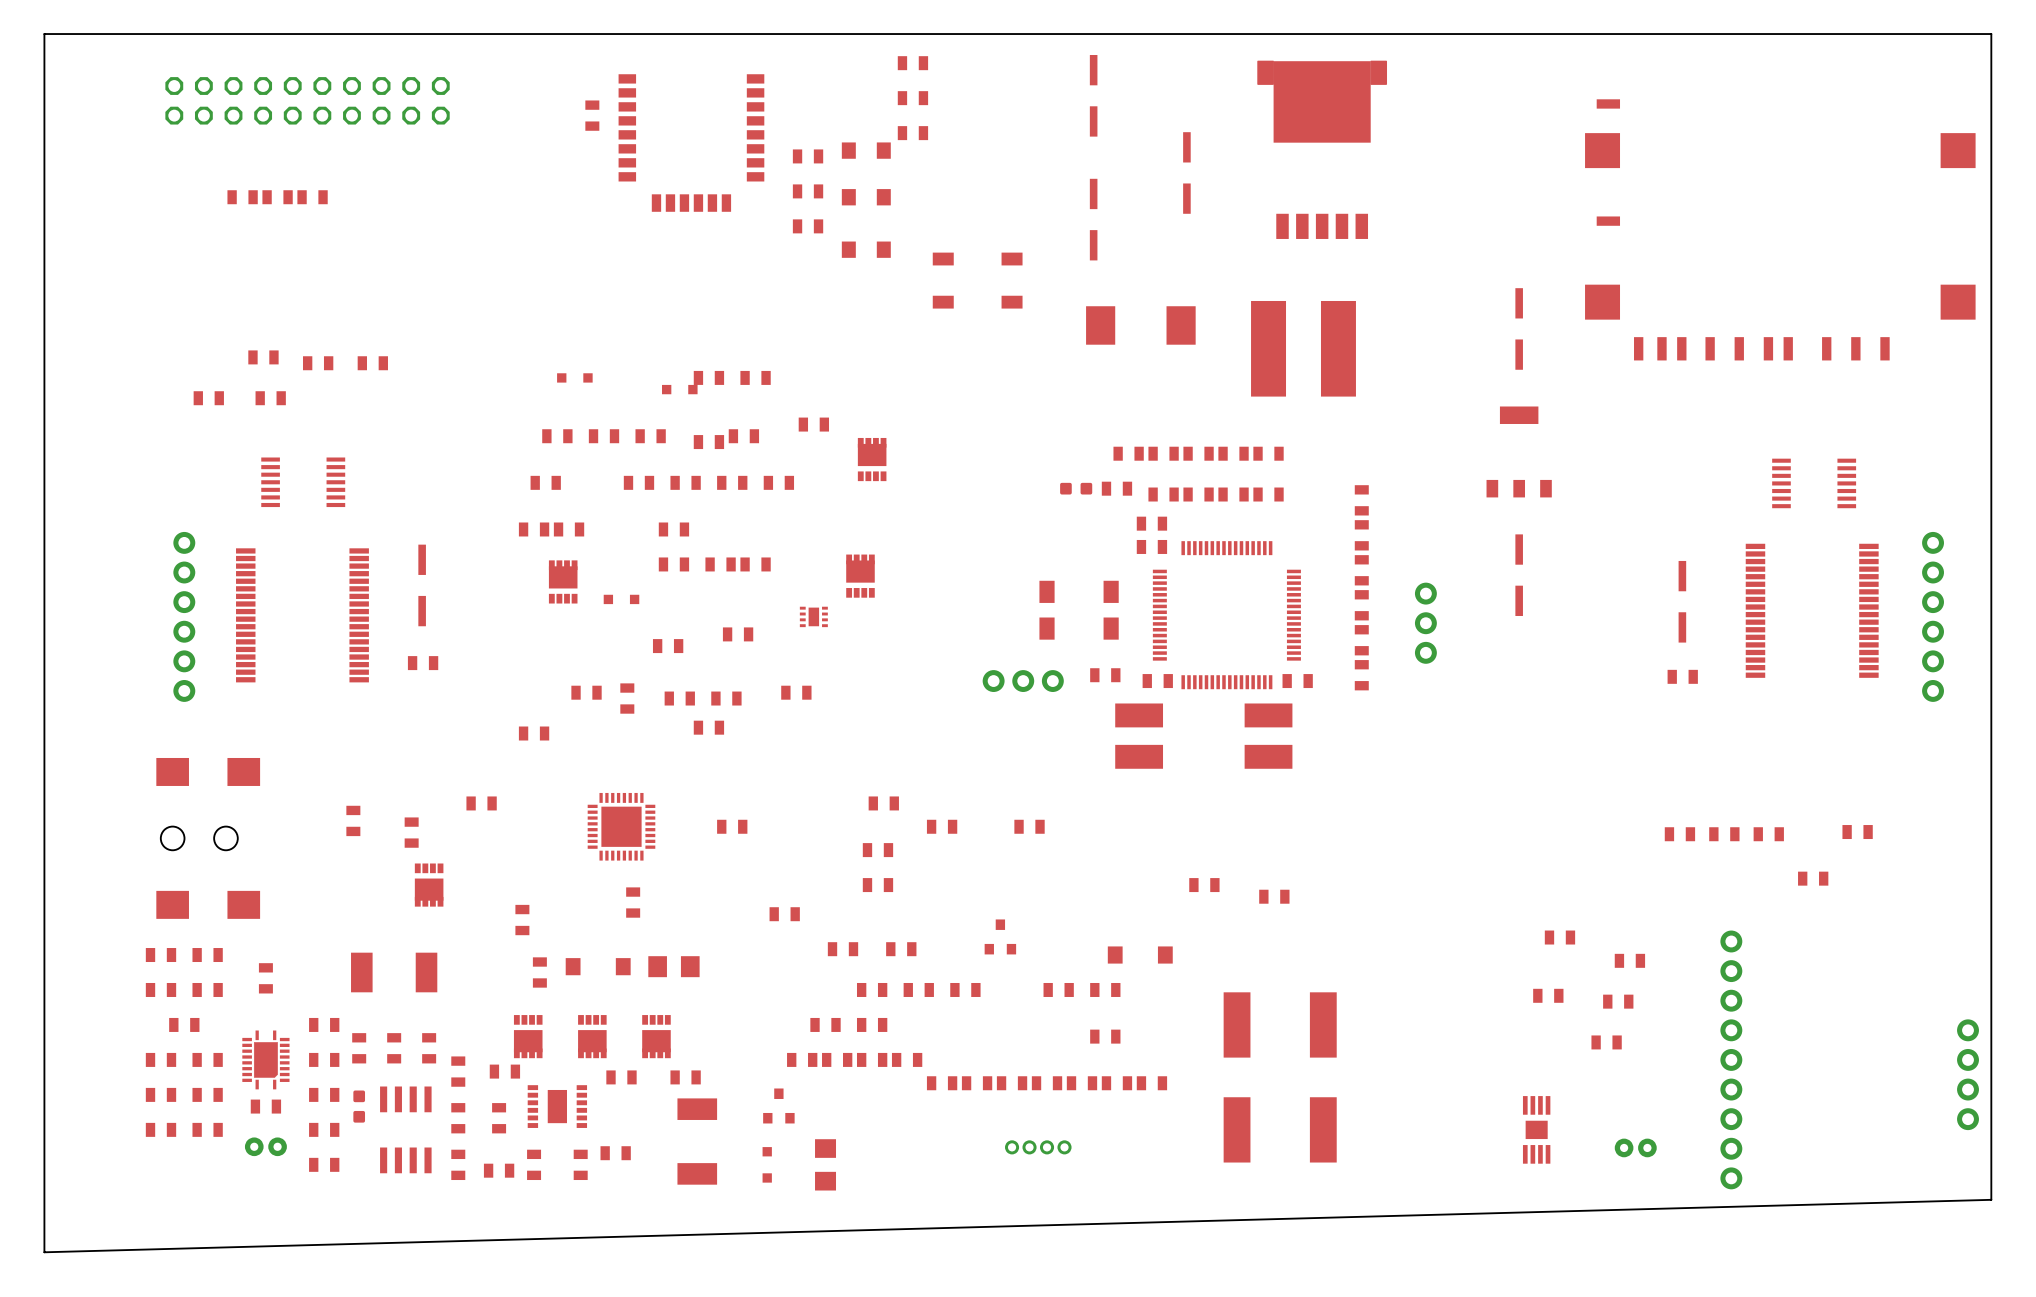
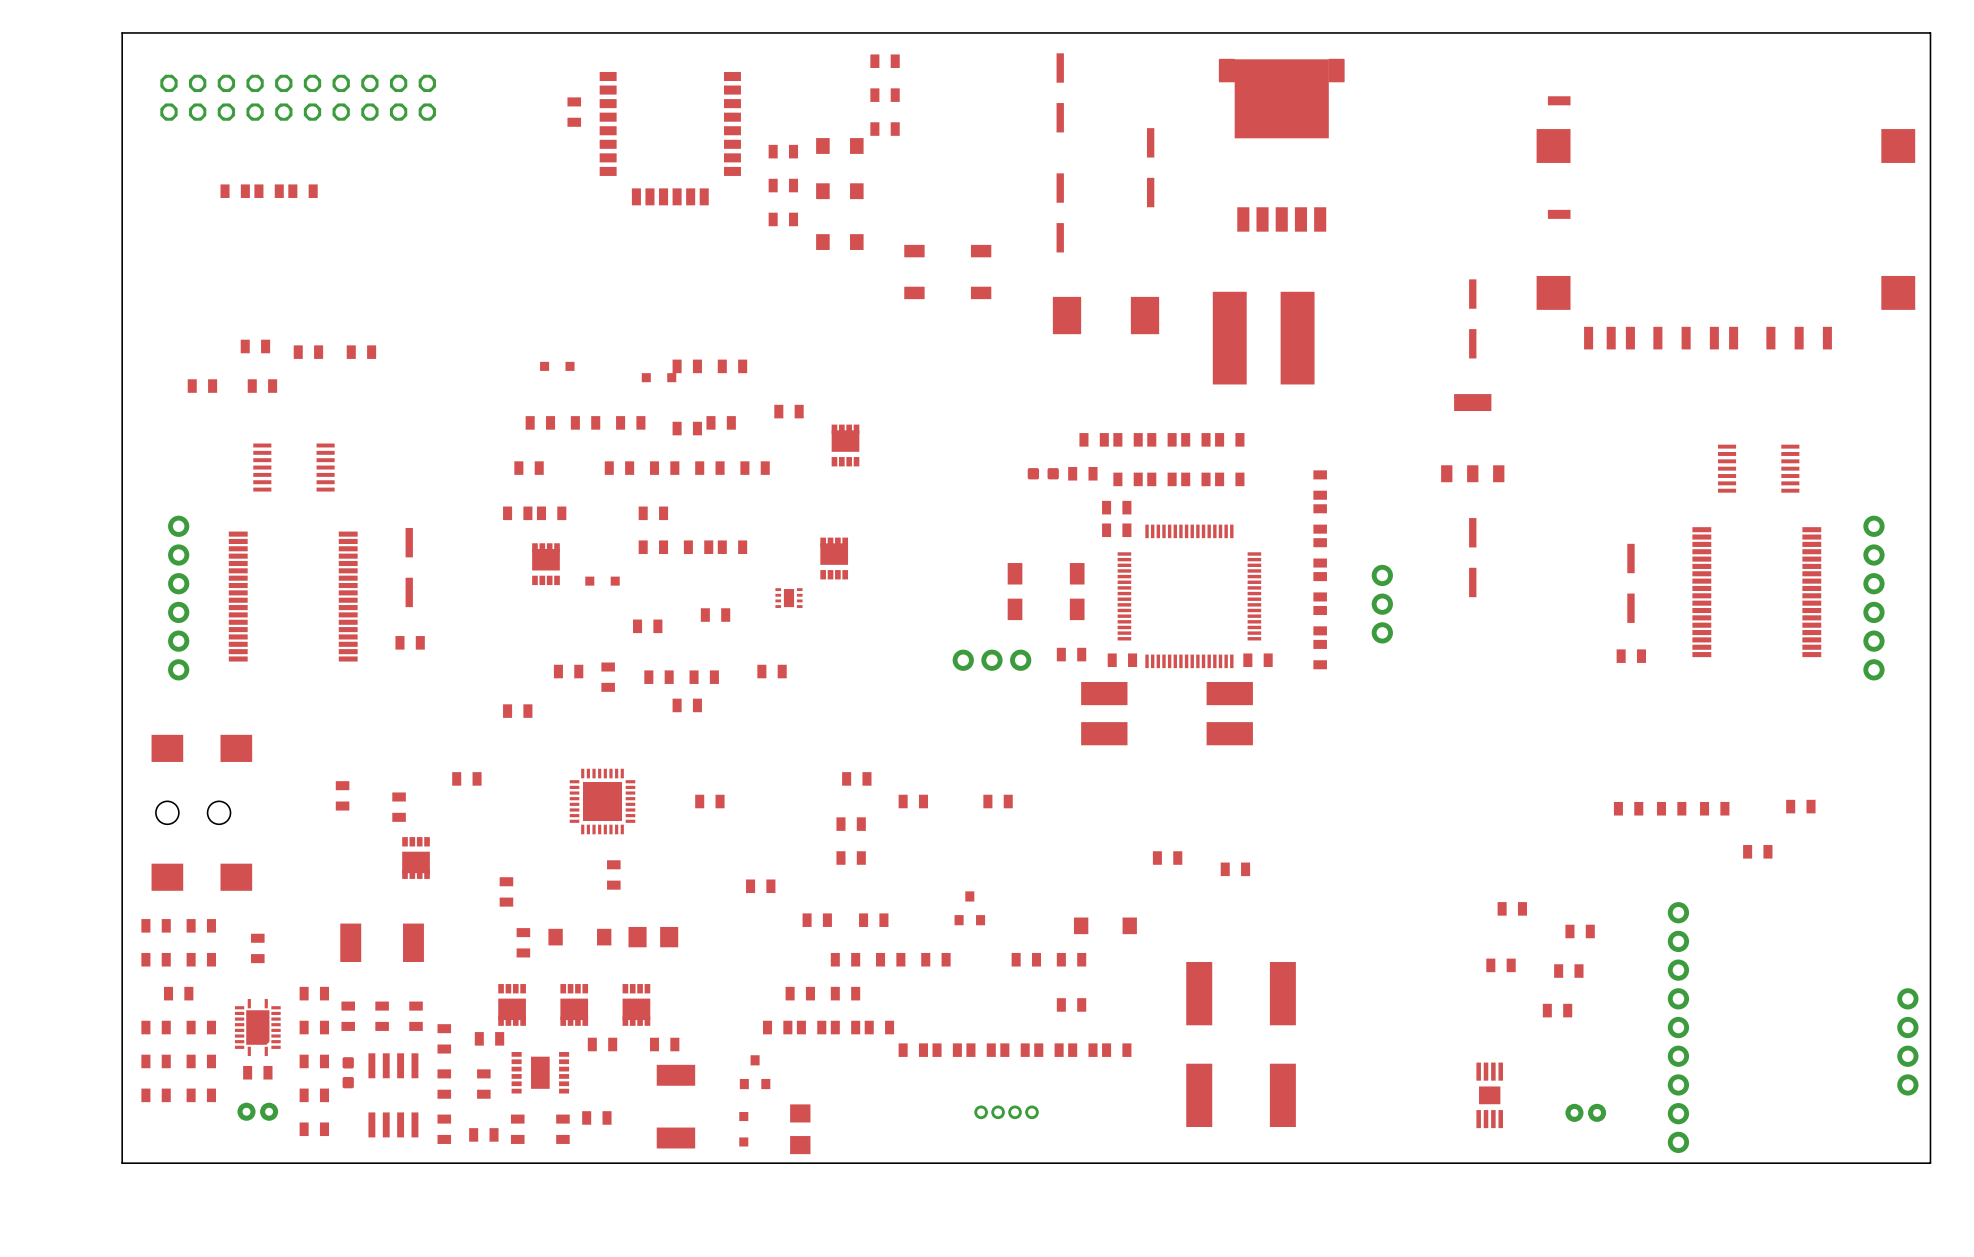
board edge: (126, 34) (44, 34) (44, 1252) (1991, 1199) -> (122, 32) (122, 1163) (1930, 1163)

